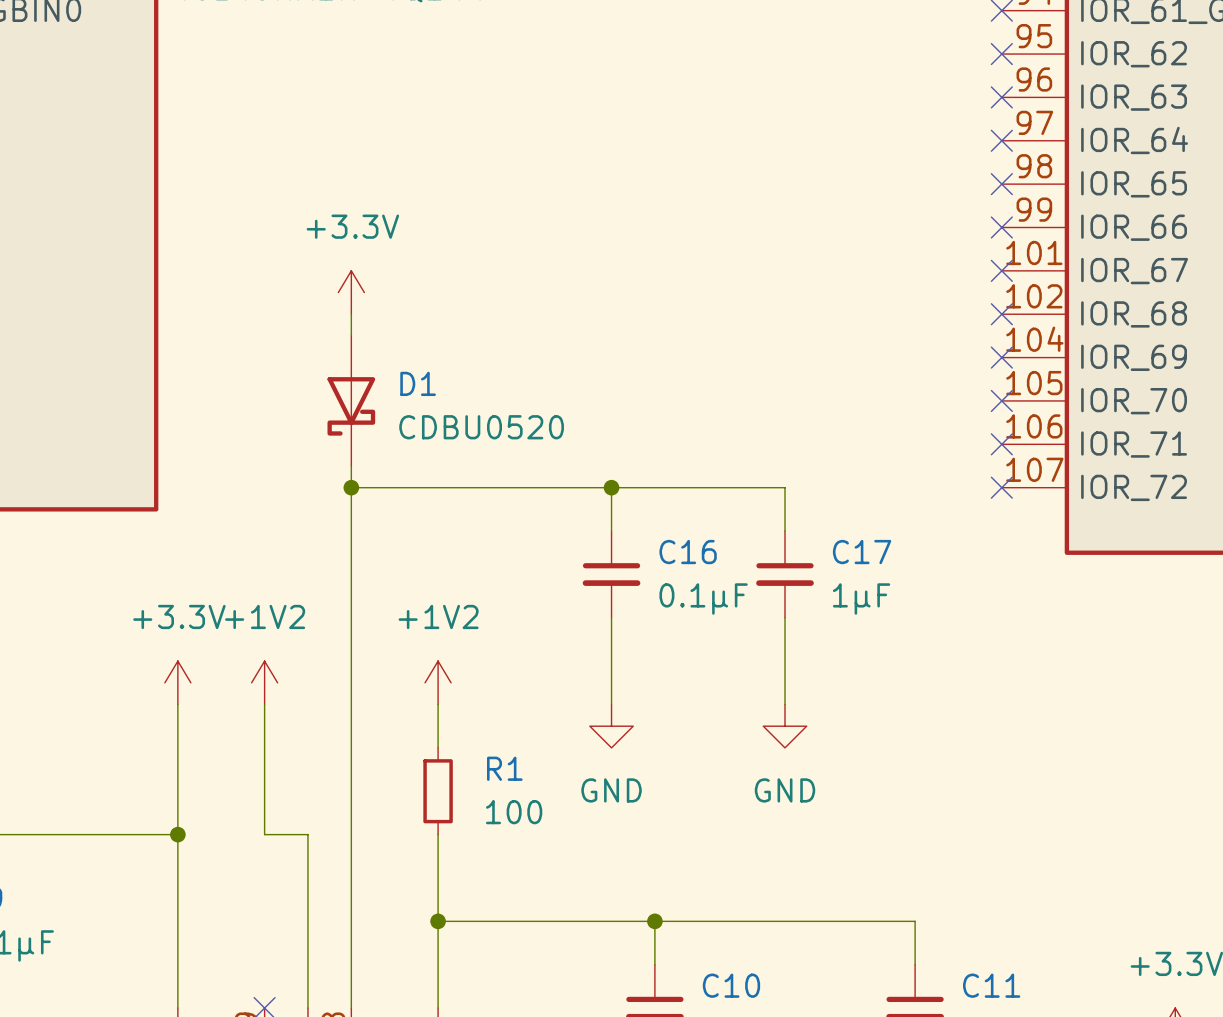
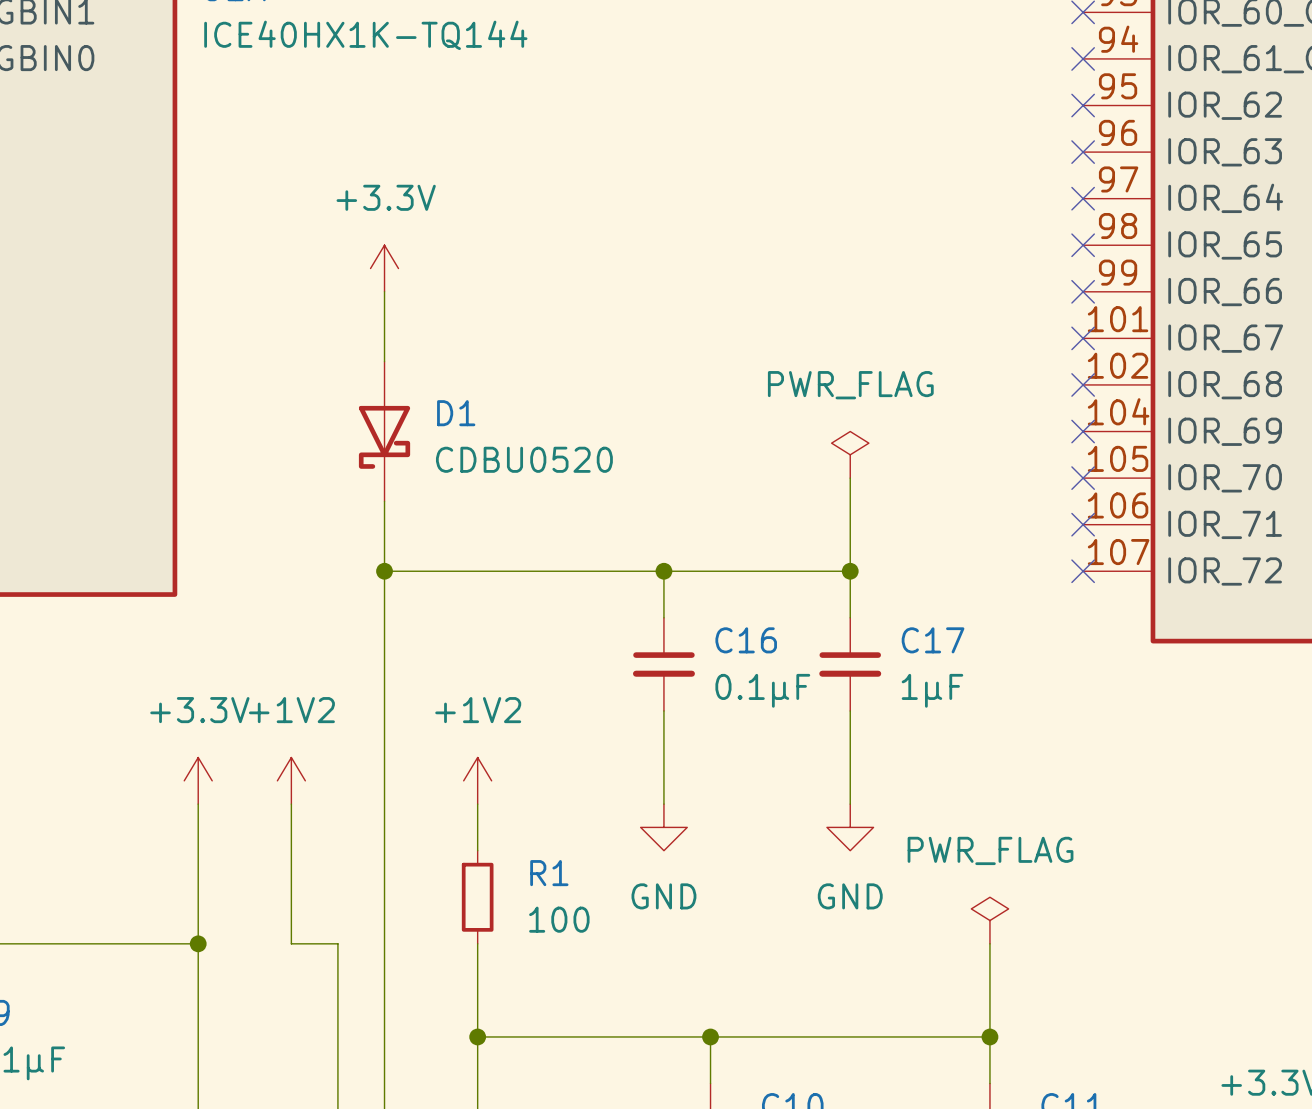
wire: none -> (384, 291) (384, 361)
power symbol position: +3.3V (351, 292) -> +3.3V (384, 268)
power symbol: none -> PWR_FLAG (850, 454)
D1 position: (351, 400) -> (384, 431)
wire: none -> (850, 478) (850, 571)
junction: none -> (850, 571)
power symbol: none -> PWR_FLAG (989, 920)
wire: none -> (989, 943) (989, 1036)
junction: none -> (989, 1036)

